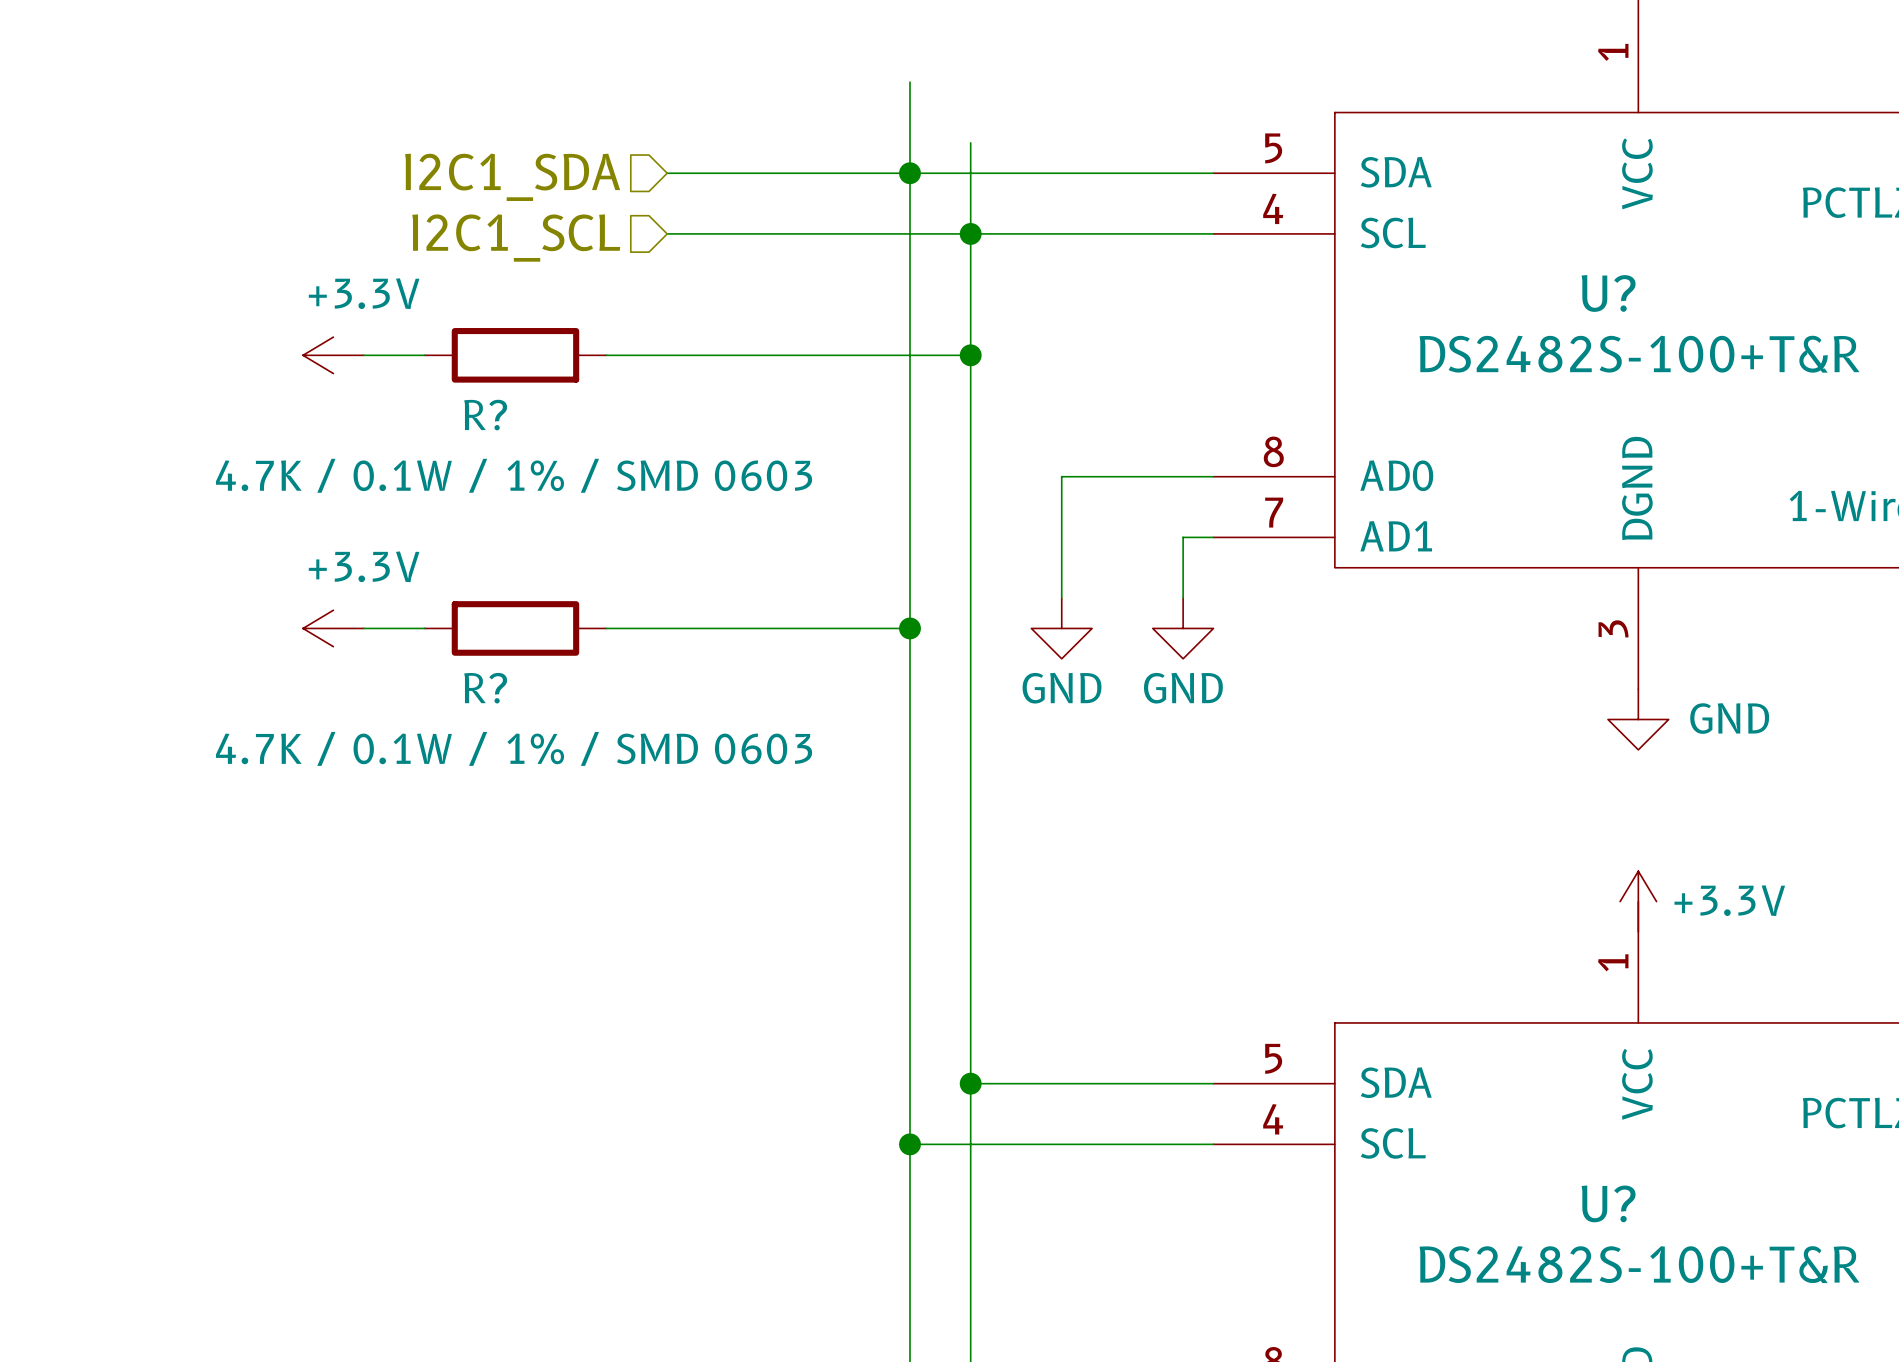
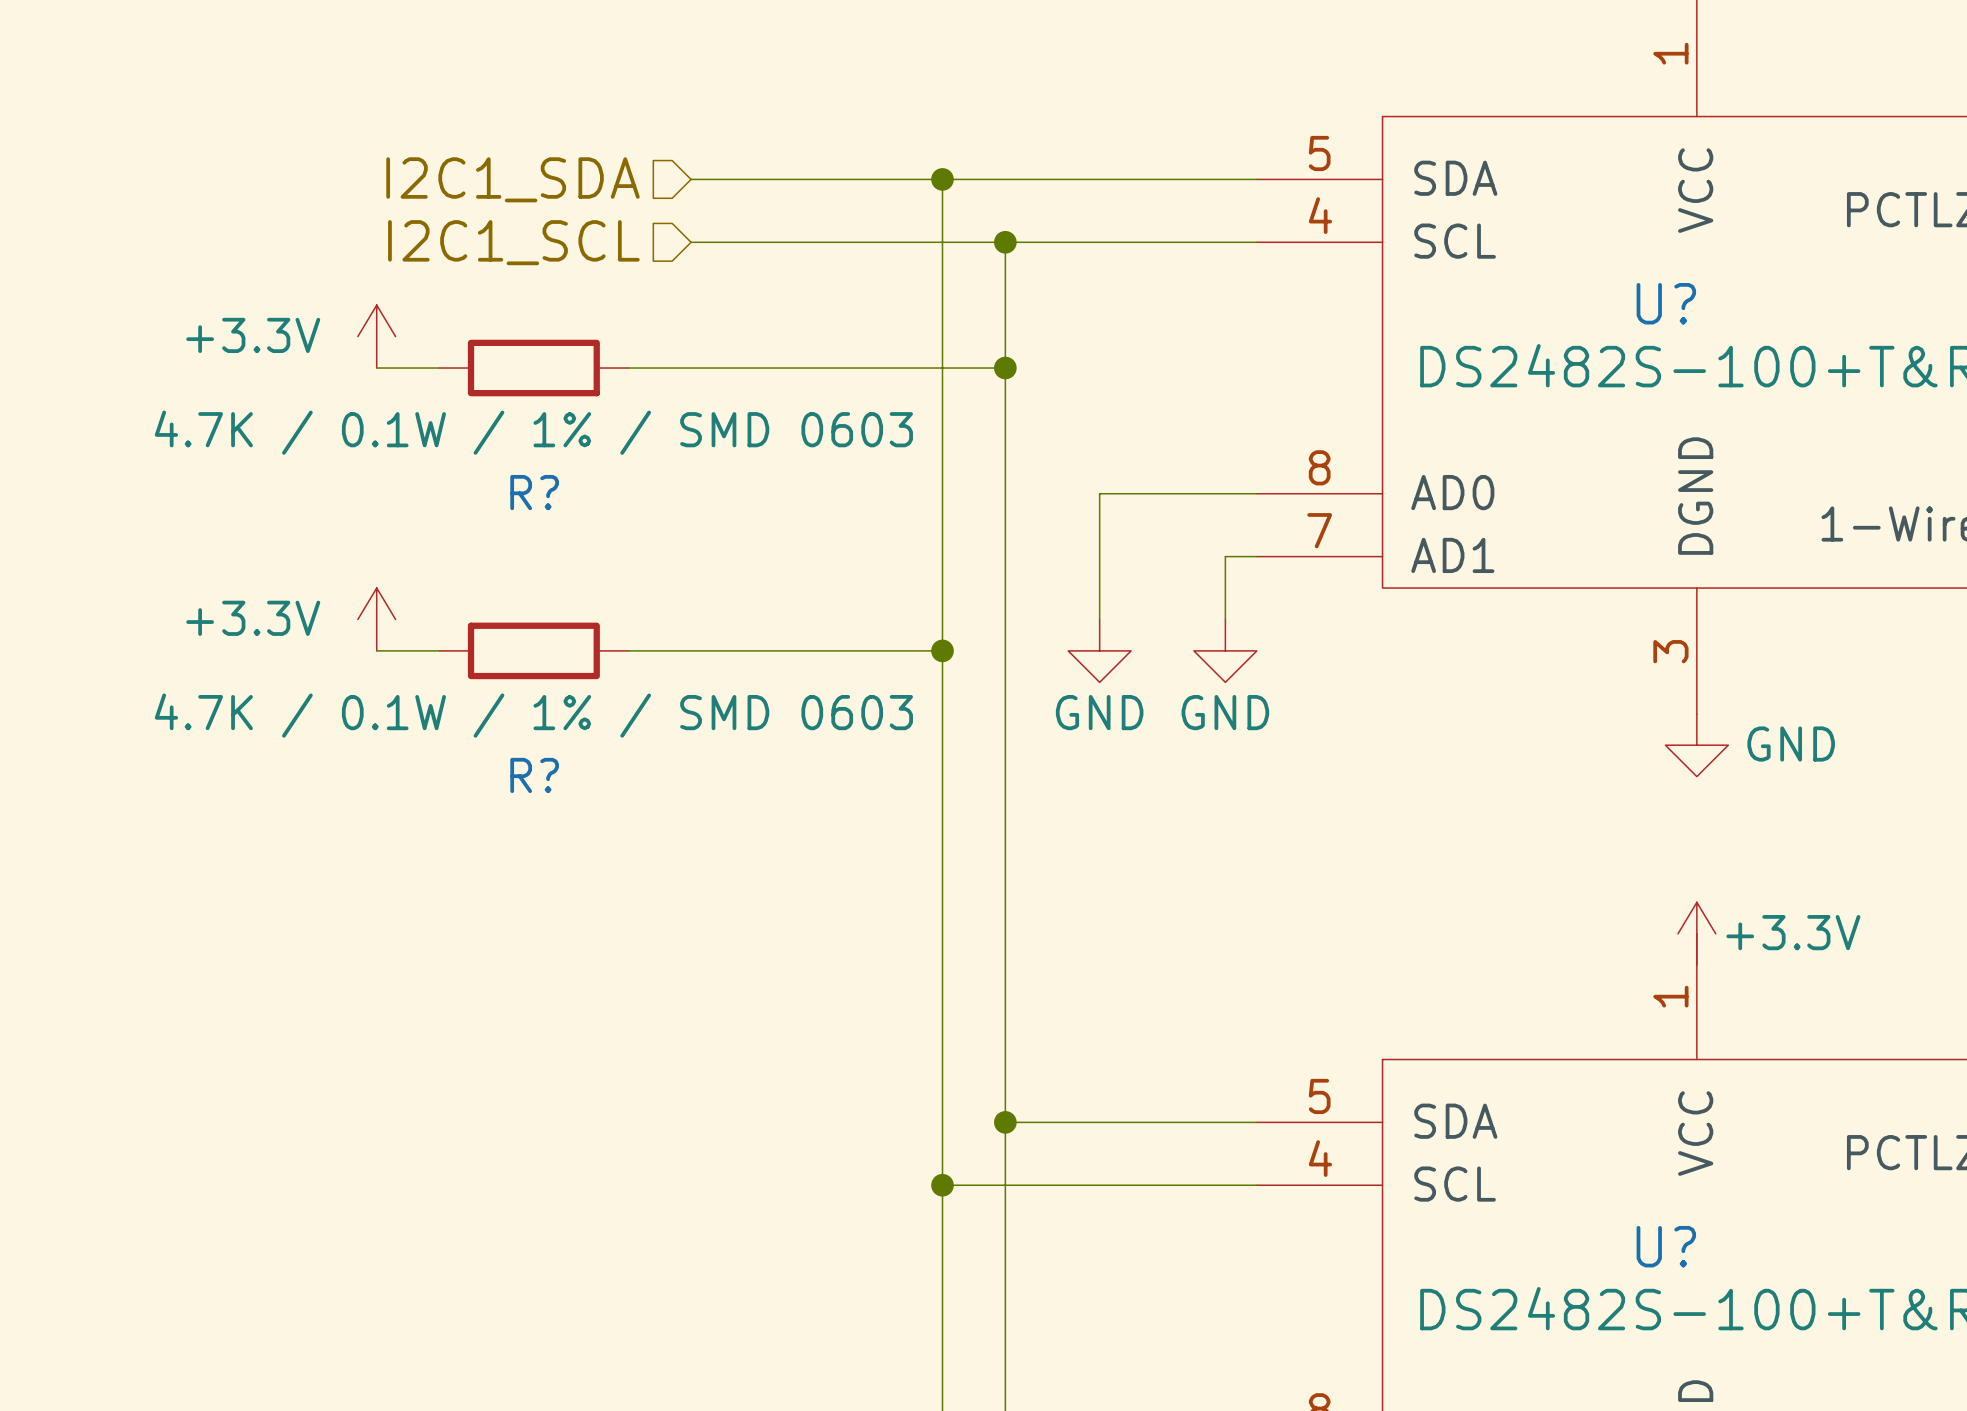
wire: (909, 82) (909, 173) -> none
wire: (970, 142) (970, 233) -> none
power symbol text position: +3.3V (364, 293) -> +3.3V (253, 335)
power symbol rotation: 0° (333, 355) -> 90° clockwise (376, 336)
power symbol position: +3.3V (333, 355) -> +3.3V (376, 336)
R? name position: R? (485, 415) -> R? (534, 492)
R? value position: 4.7K / 0.1W / 1% / SMD 0603 (514, 475) -> 4.7K / 0.1W / 1% / SMD 0603 (533, 432)
power symbol text position: +3.3V (364, 566) -> +3.3V (253, 618)
power symbol rotation: 0° (333, 628) -> 90° clockwise (376, 619)
power symbol position: +3.3V (333, 628) -> +3.3V (376, 619)
R? name position: R? (485, 688) -> R? (534, 775)
R? value position: 4.7K / 0.1W / 1% / SMD 0603 (514, 748) -> 4.7K / 0.1W / 1% / SMD 0603 (533, 715)

